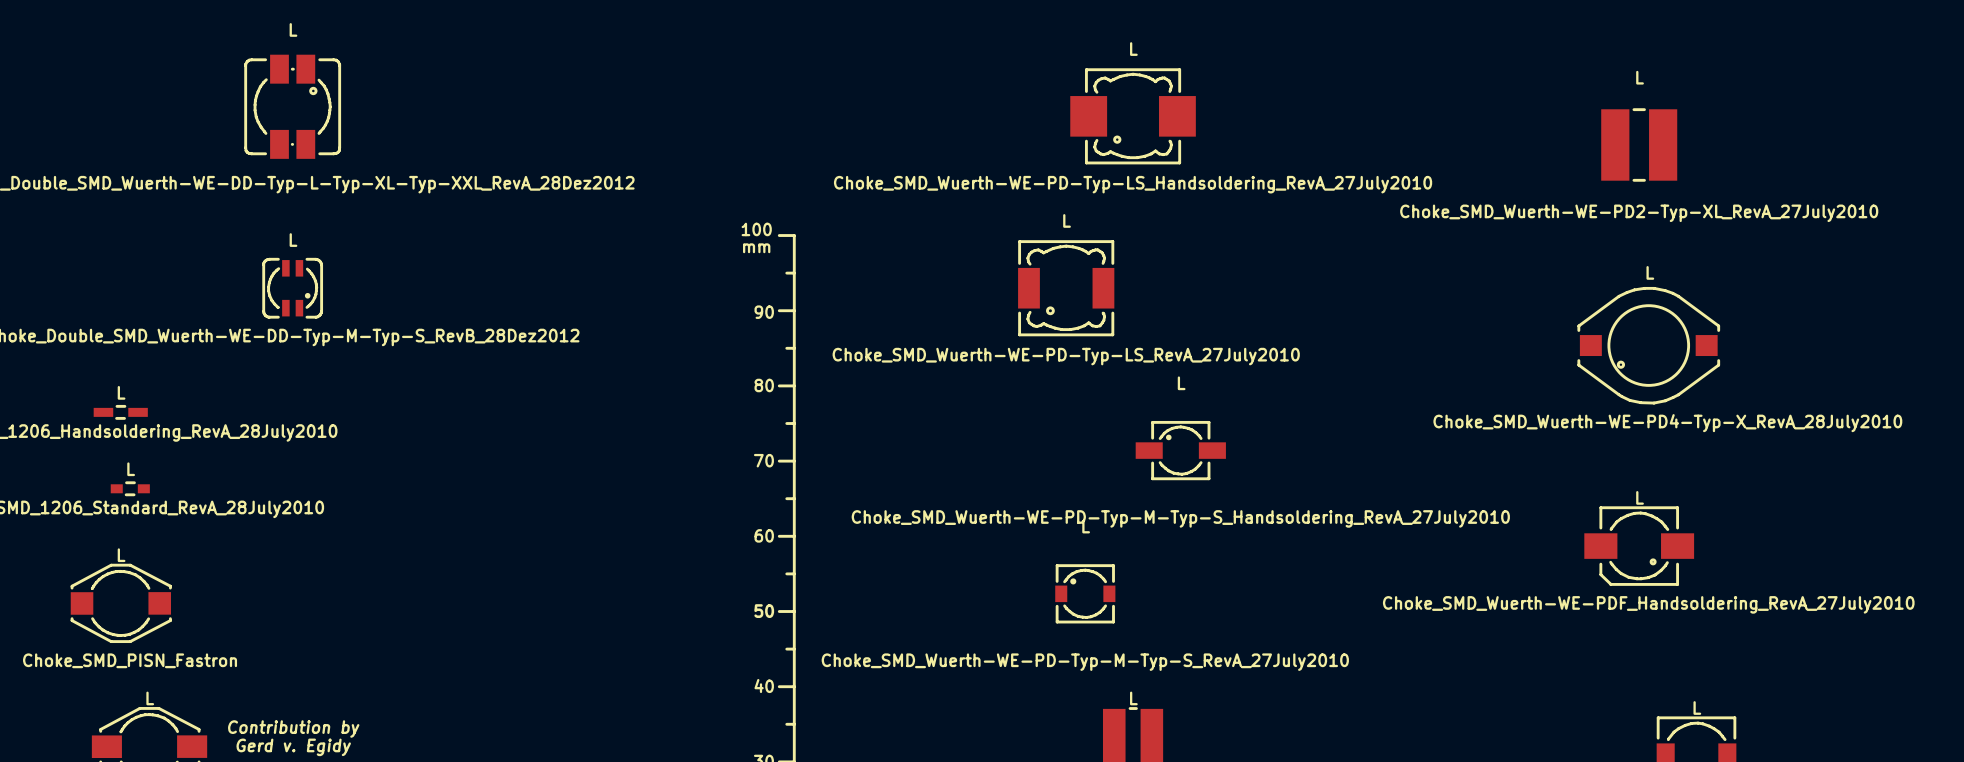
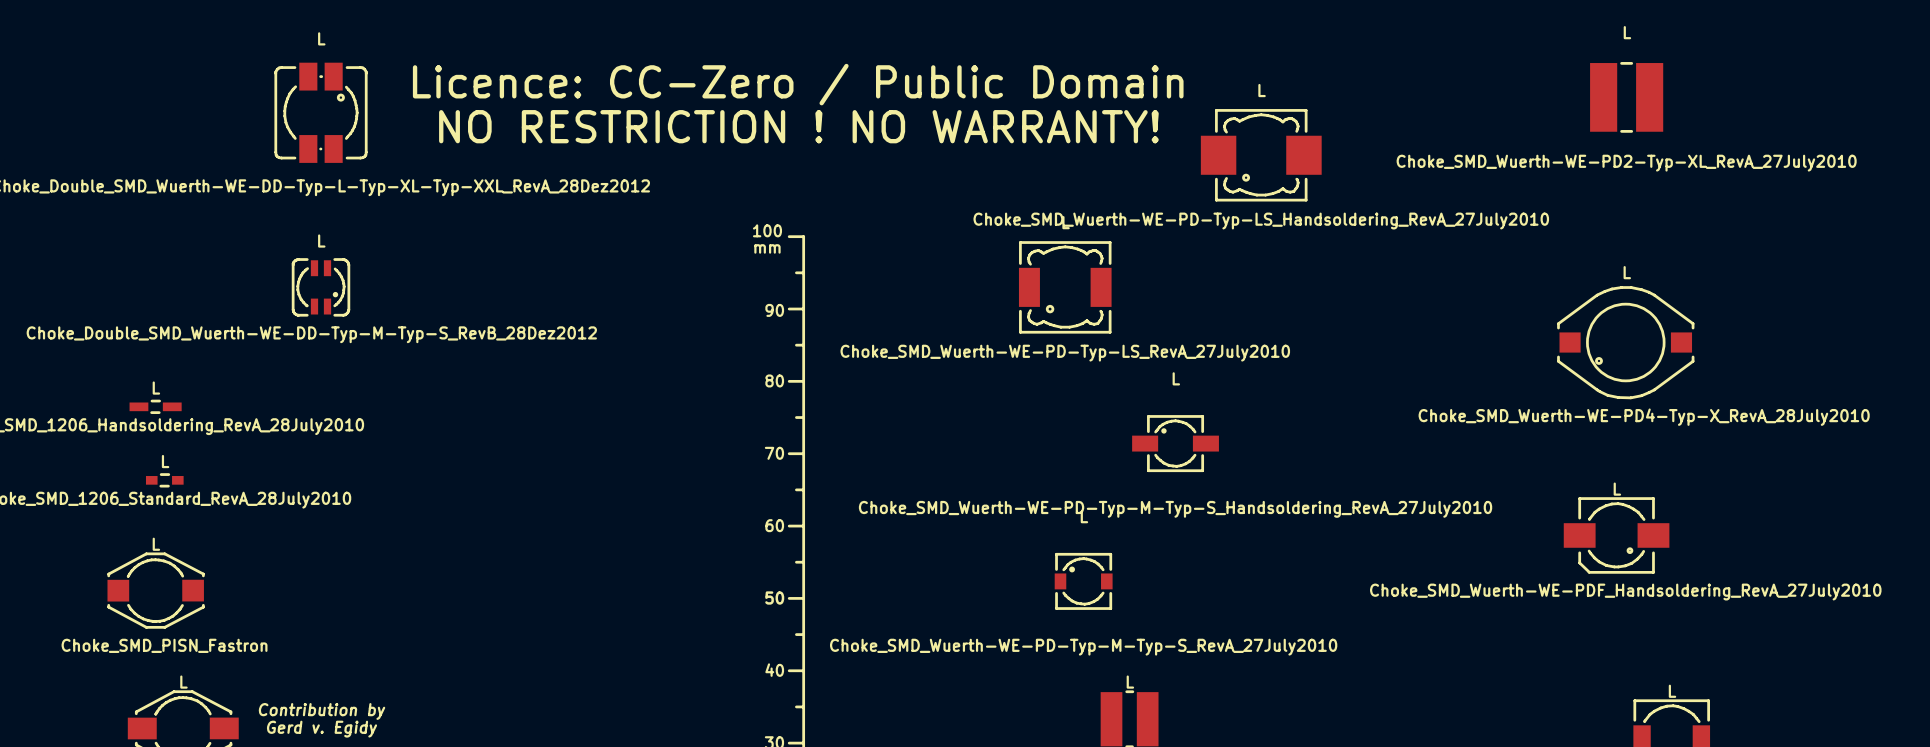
text: none -> Licence: CC-Zero / Public Domain (798, 84)
L position: (1133, 116) -> (1261, 155)
text: none -> NO RESTRICTION ! NO WARRANTY! (798, 126)
L position: (1639, 144) -> (1626, 97)

